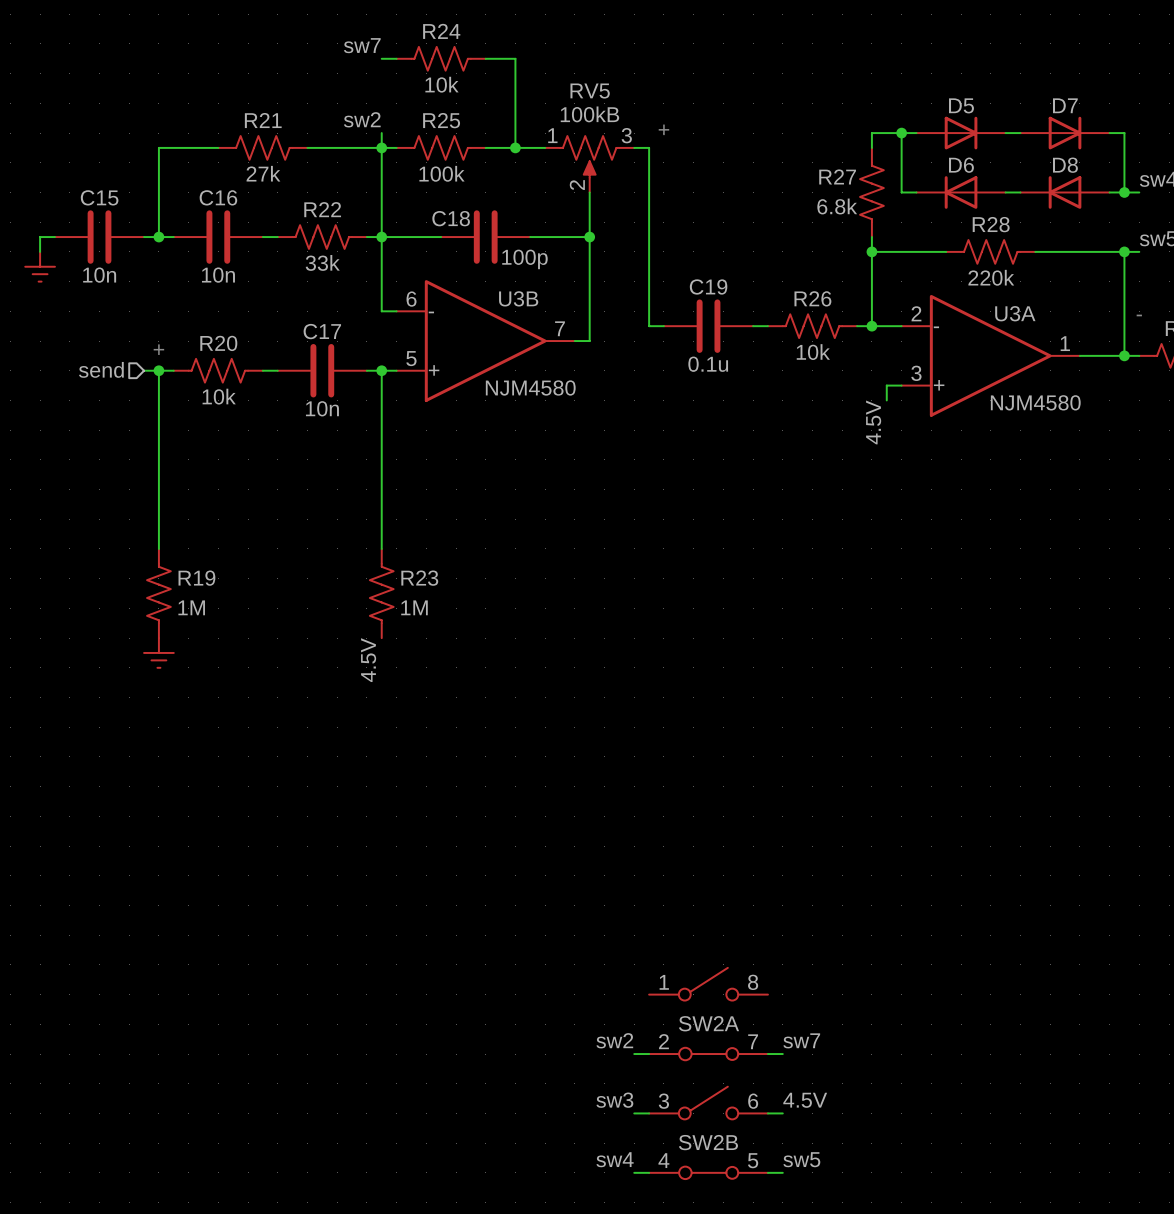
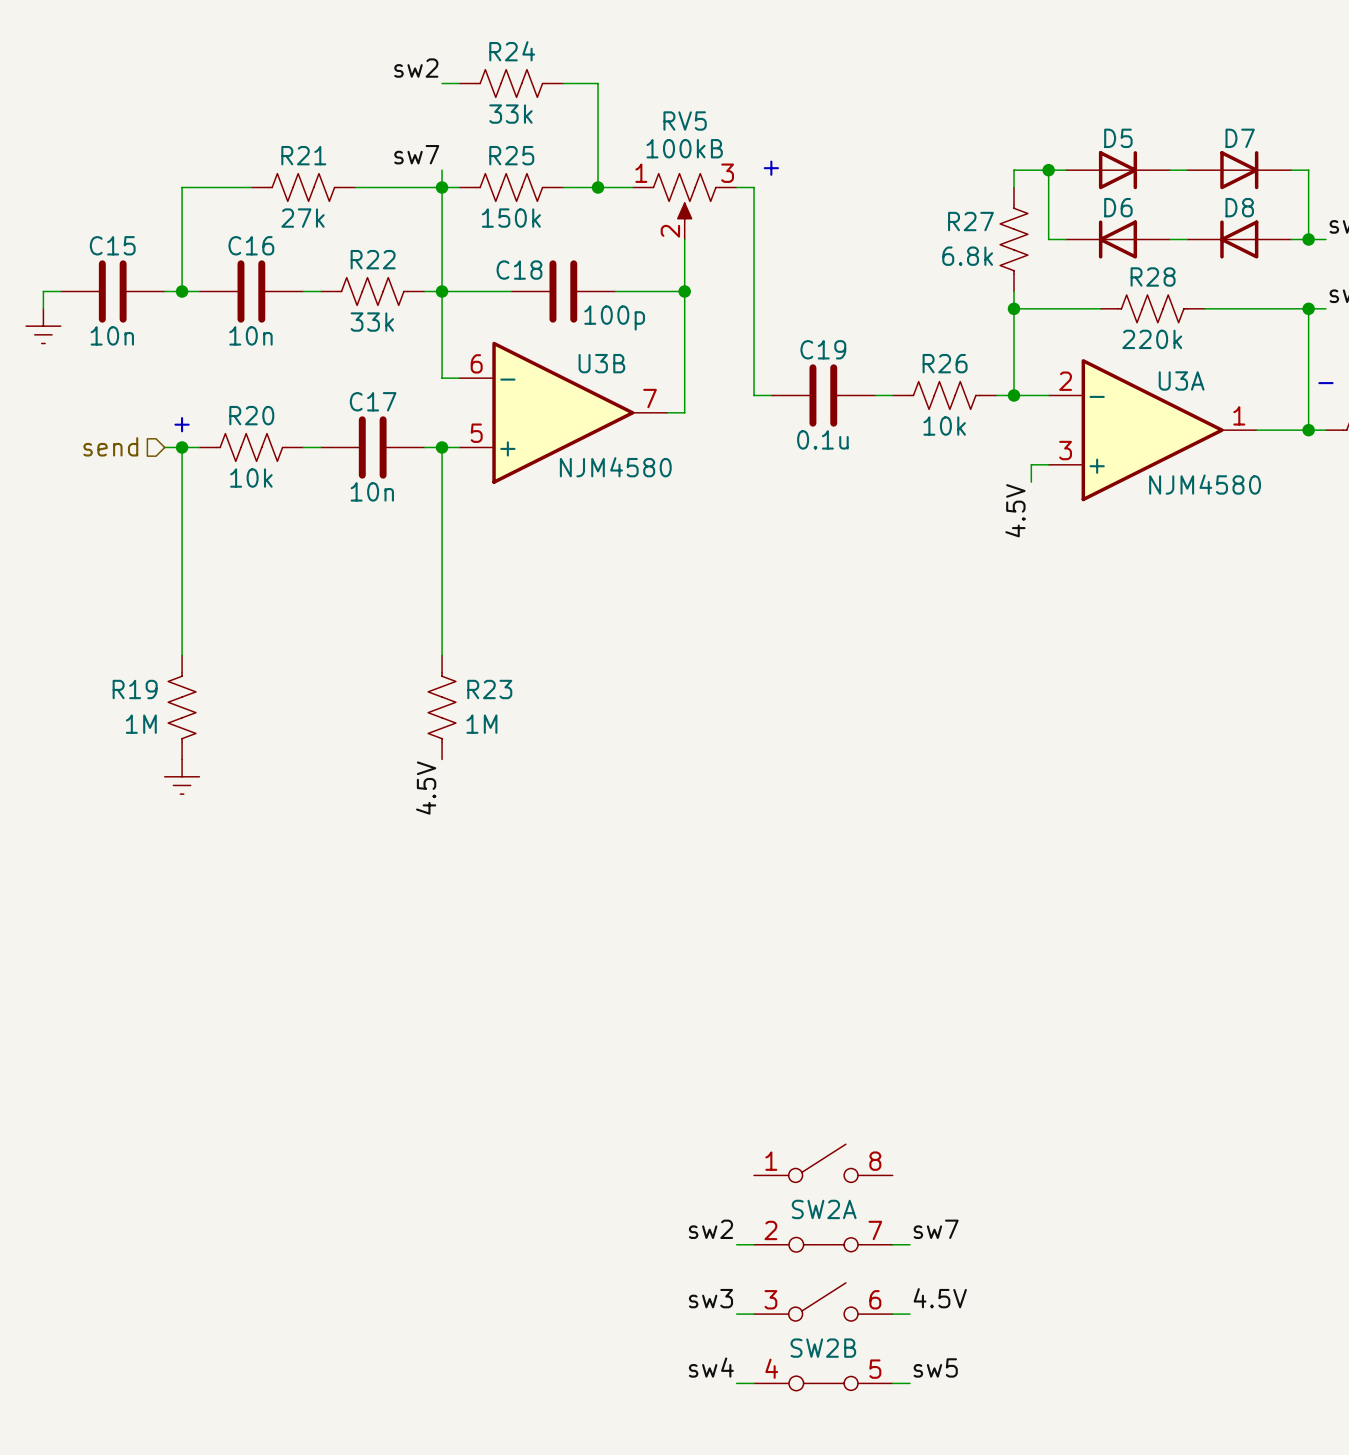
label: sw7 (362, 45) -> sw2 (416, 68)
R24 value: 10k (441, 84) -> 33k (510, 114)
label: sw2 (362, 119) -> sw7 (416, 154)
R25 value: 100k (441, 173) -> 150k (511, 218)
R19 flip: as is (158, 593) -> left-right (182, 707)

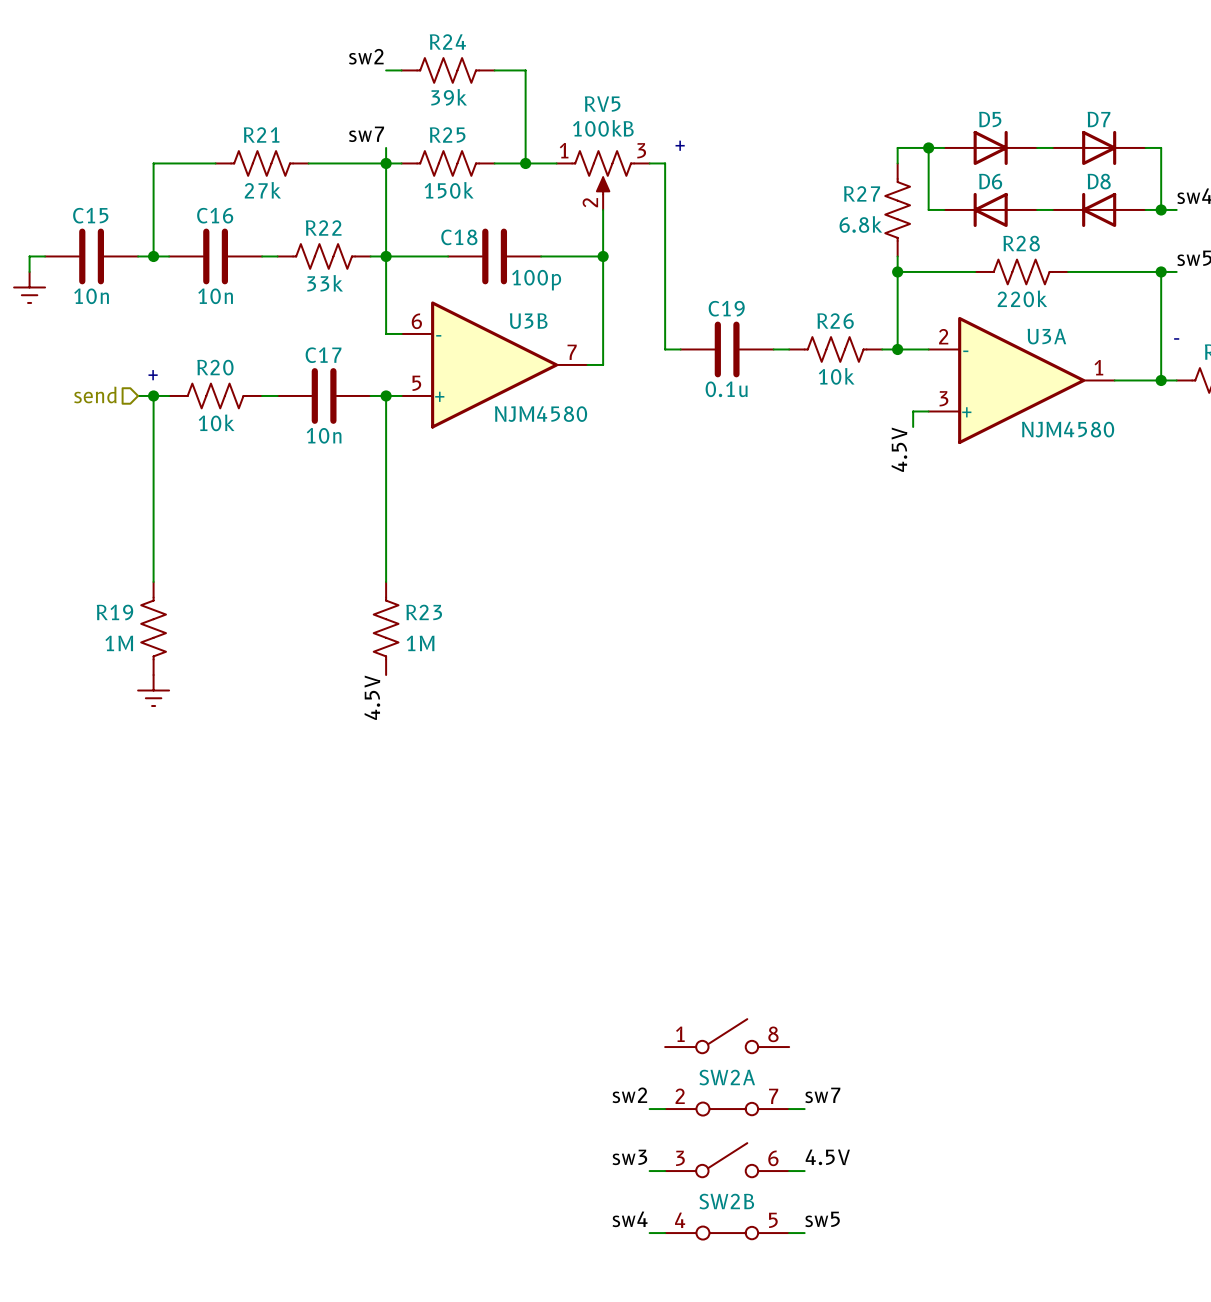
R24 value: 33k (510, 114) -> 39k (449, 97)

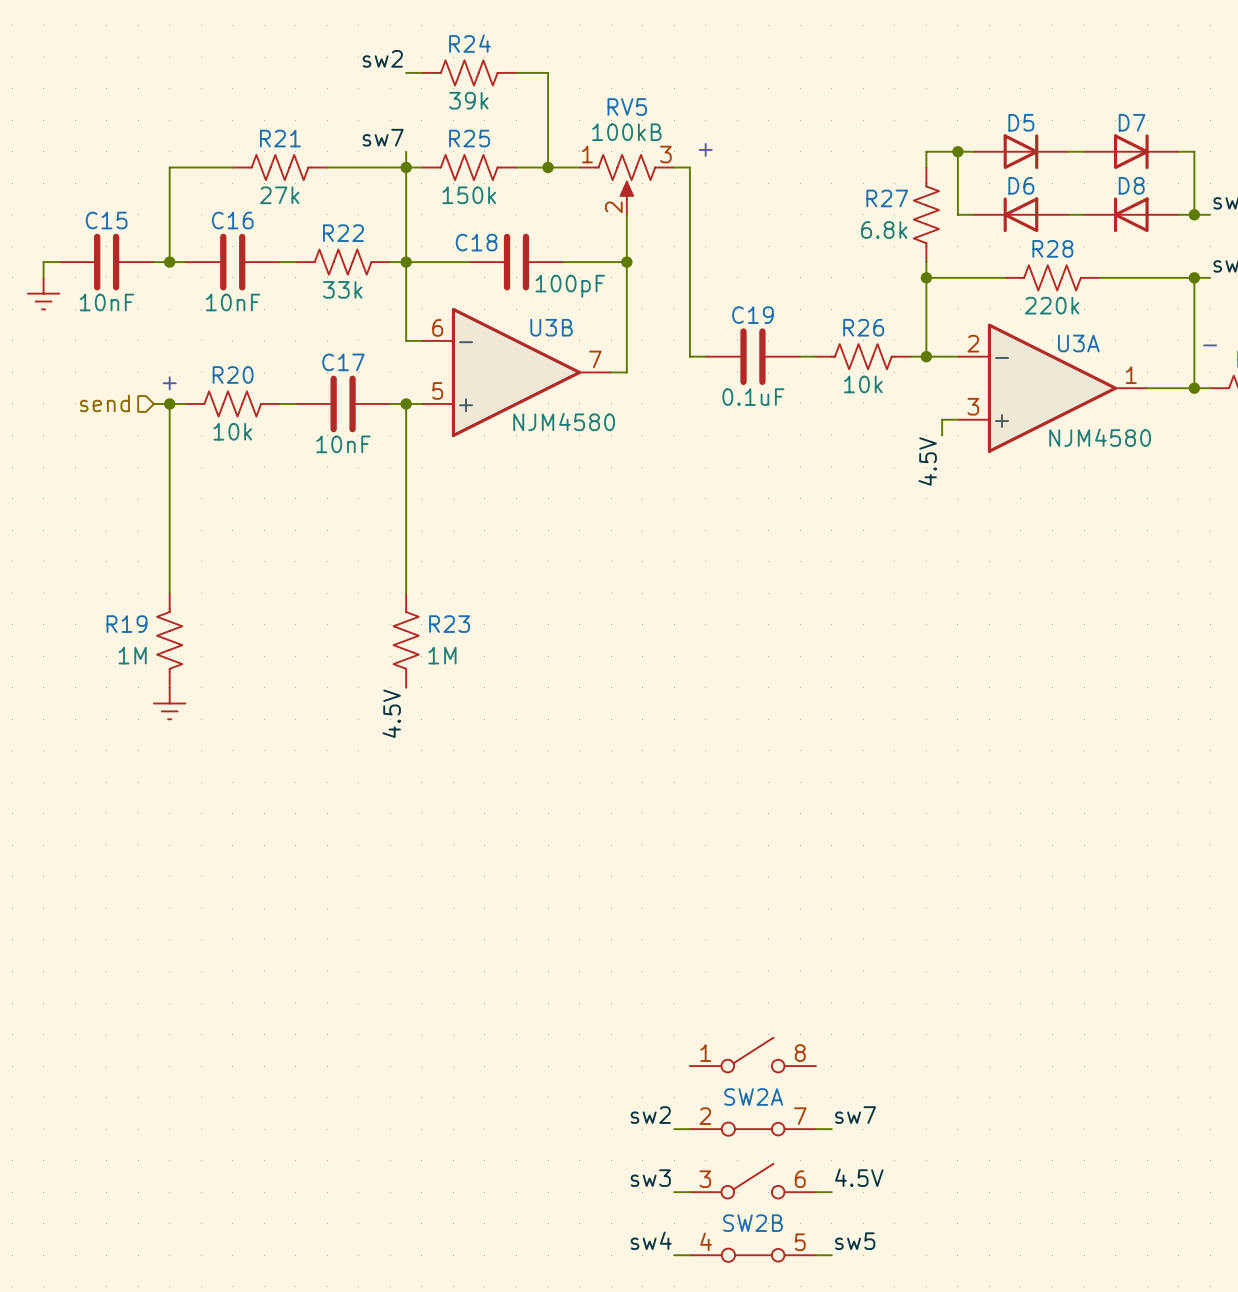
C18 value: 100p (536, 280) -> 100pF (570, 286)
C15 value: 10n (91, 296) -> 10nF (107, 302)
C16 value: 10n (215, 296) -> 10nF (233, 302)
C19 value: 0.1u (726, 389) -> 0.1uF (753, 397)
C17 value: 10n (324, 435) -> 10nF (343, 444)

